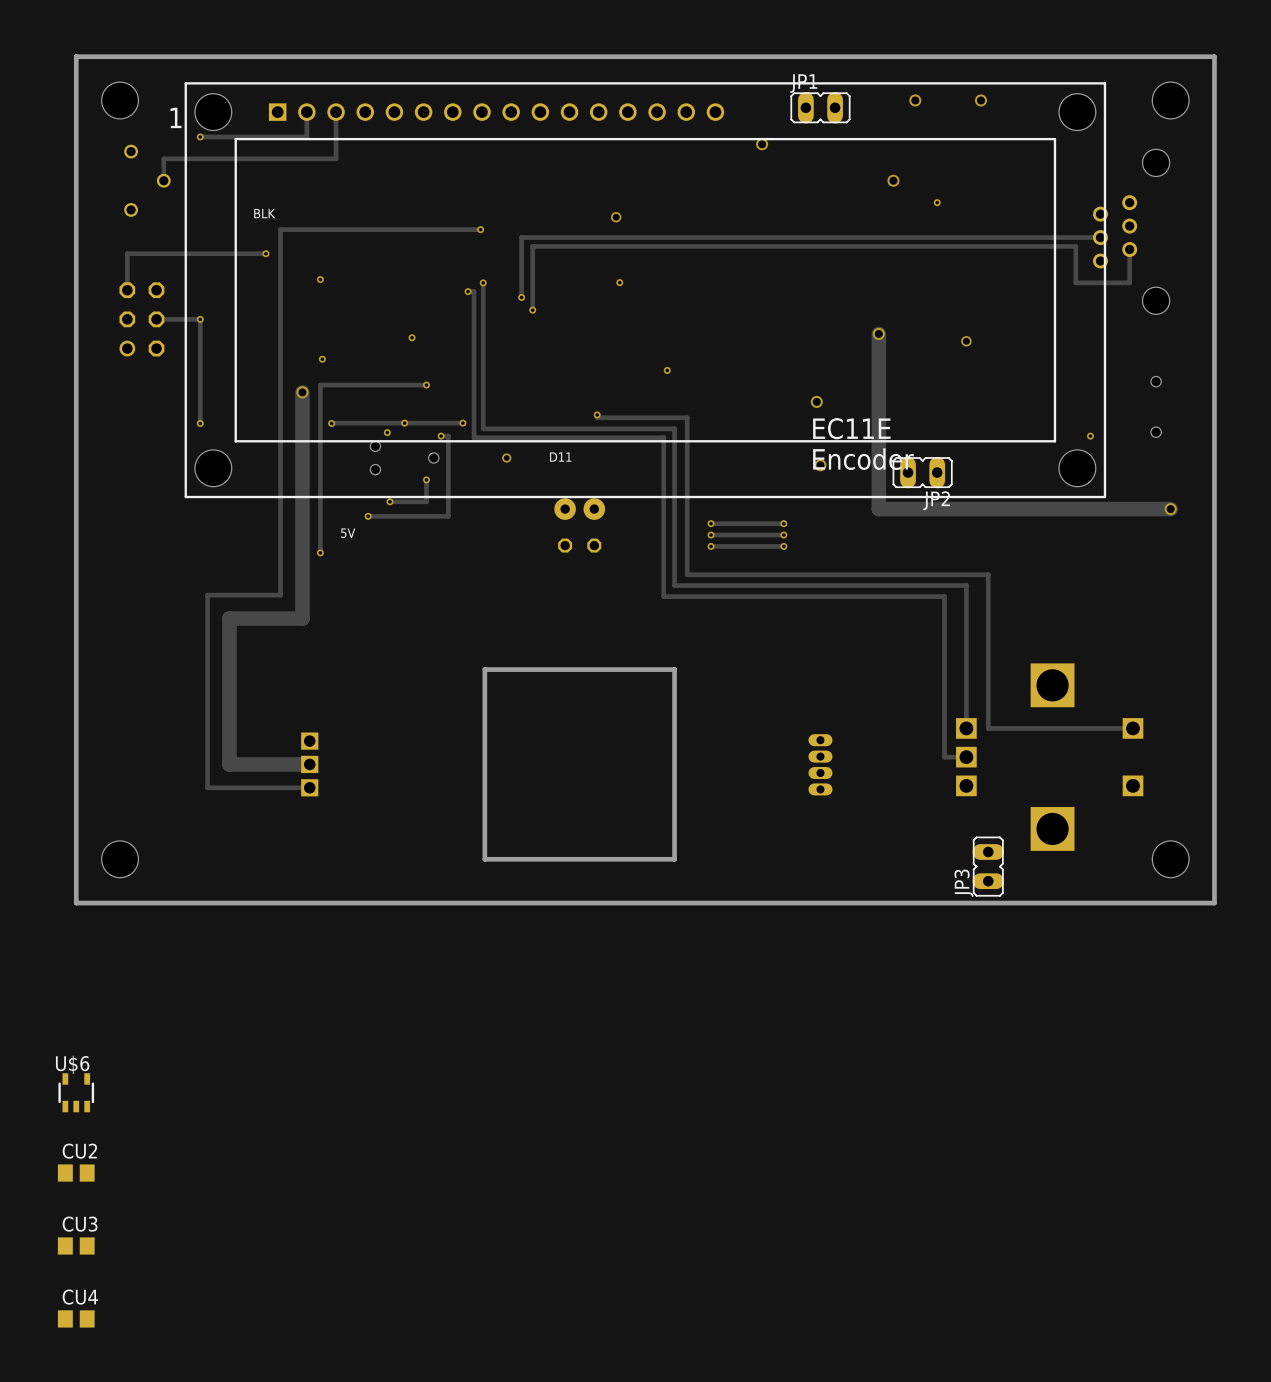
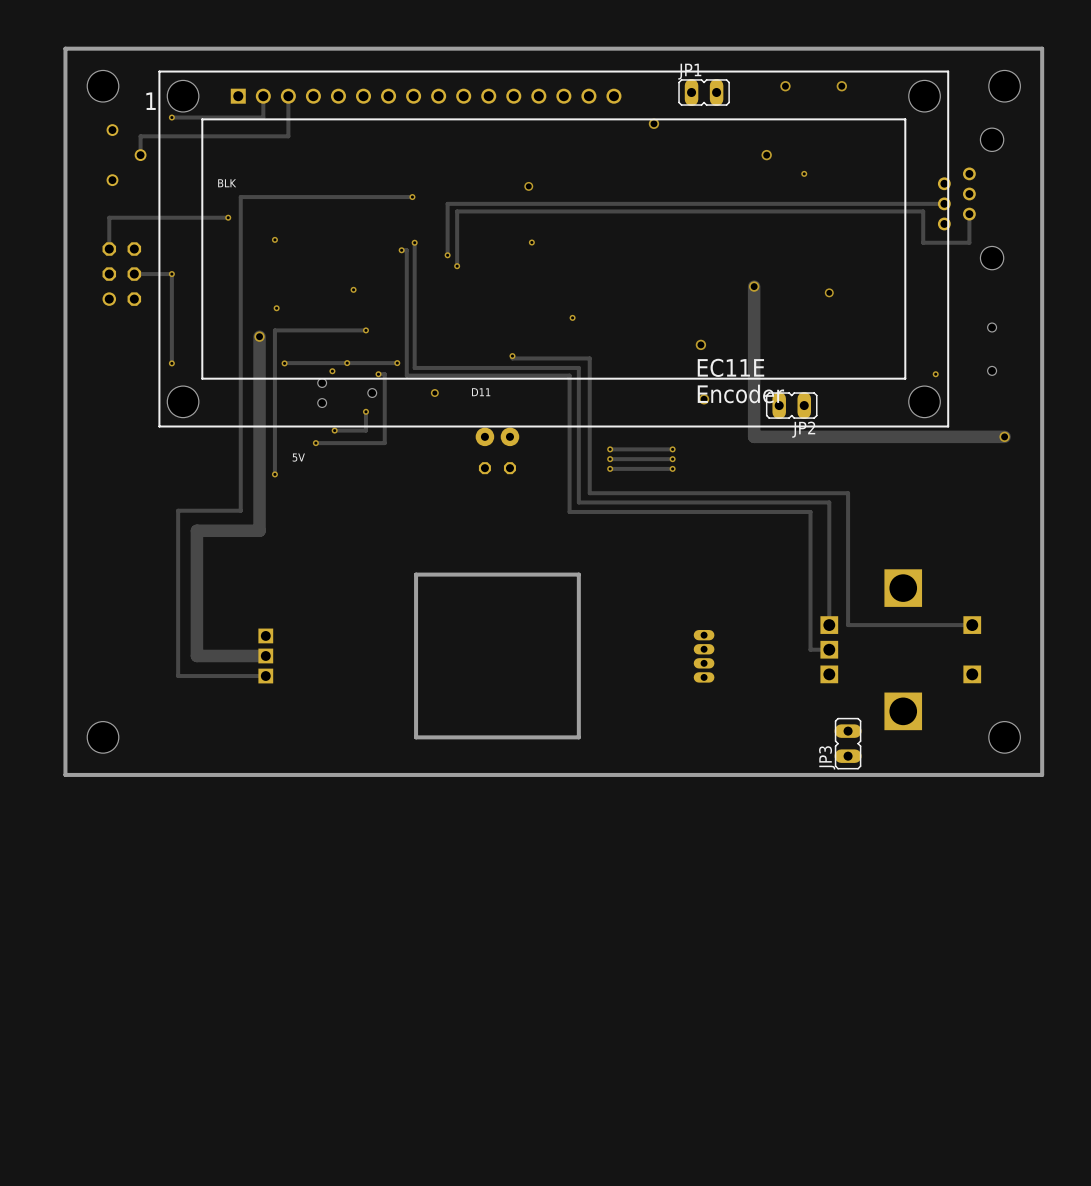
U$6: (76, 1092) -> none
CU2: (76, 1173) -> none
CU3: (76, 1245) -> none
CU4: (76, 1318) -> none

